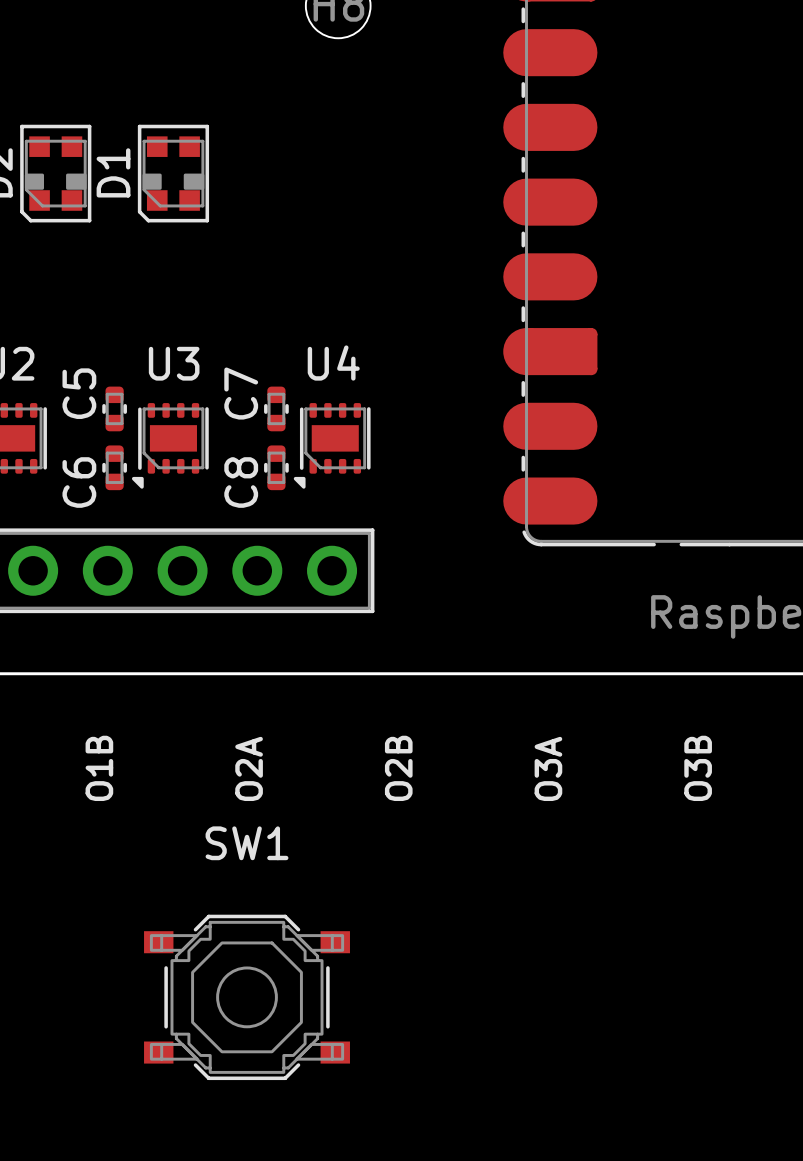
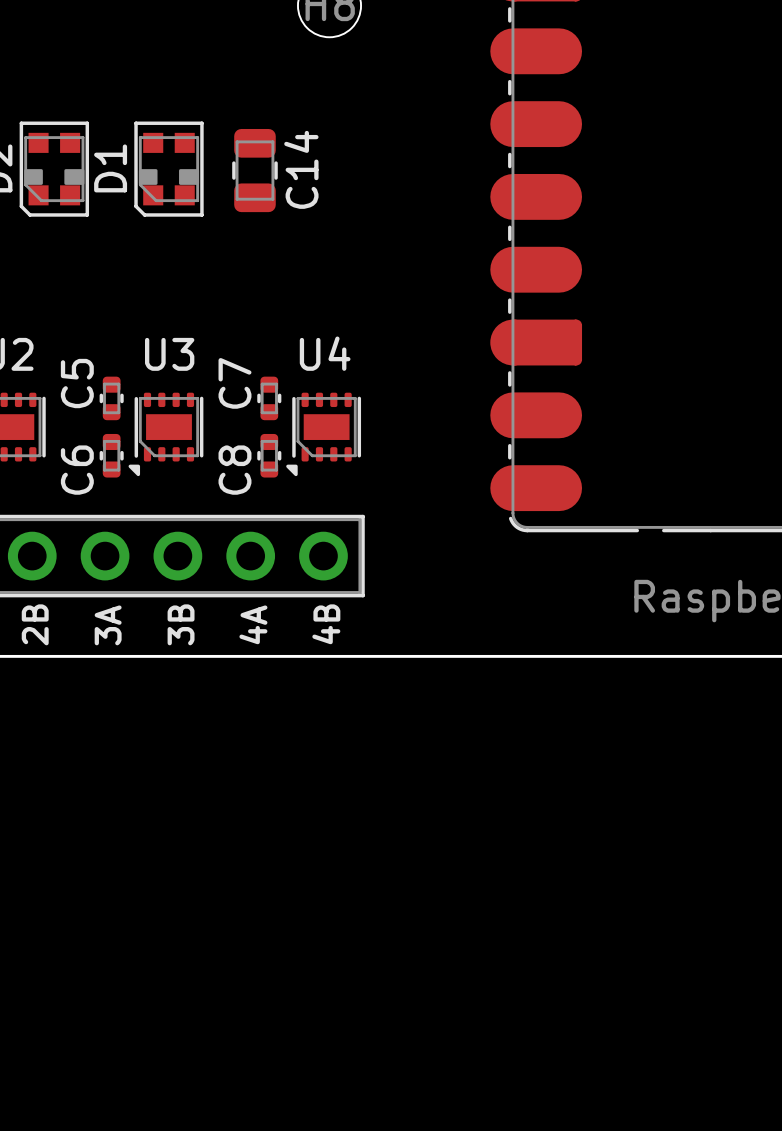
C14: none -> (254, 170)
text: none -> 4B (326, 624)
text: none -> 2B (35, 624)
text: none -> 3A (108, 625)
text: none -> 3B (181, 624)
text: none -> 4A (253, 624)
text: O1B (99, 768) -> none
text: O2A (249, 768) -> none
text: O2B (398, 768) -> none
text: O3A (548, 768) -> none
text: O3B (698, 768) -> none
SW1: (247, 997) -> none

